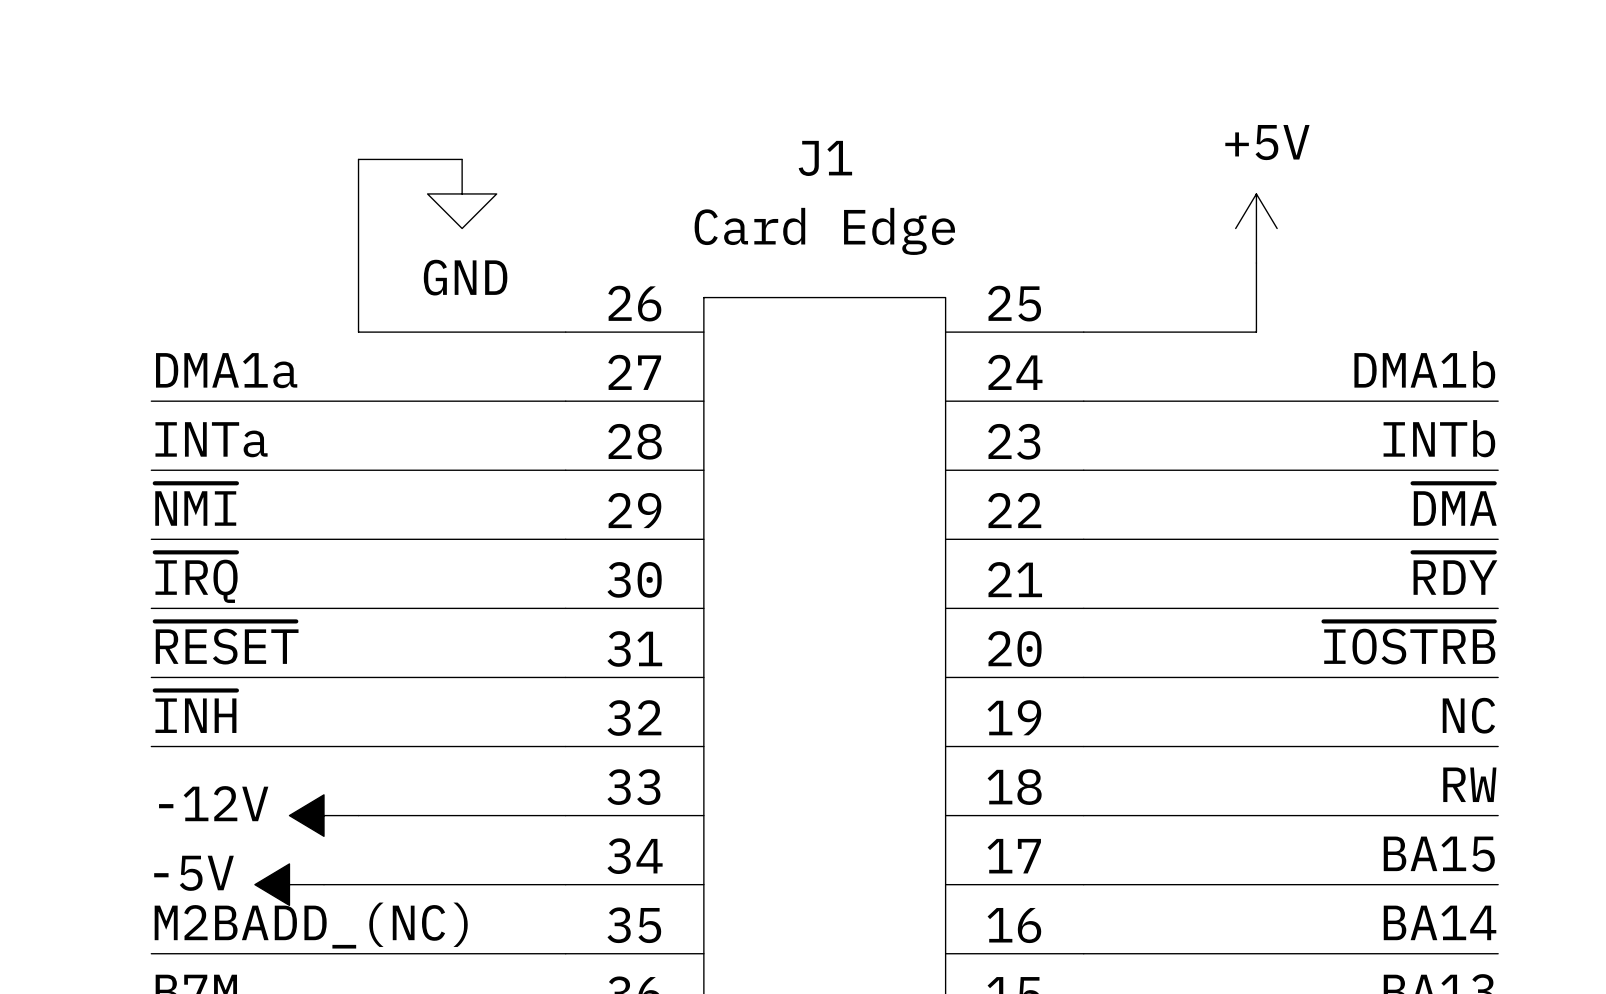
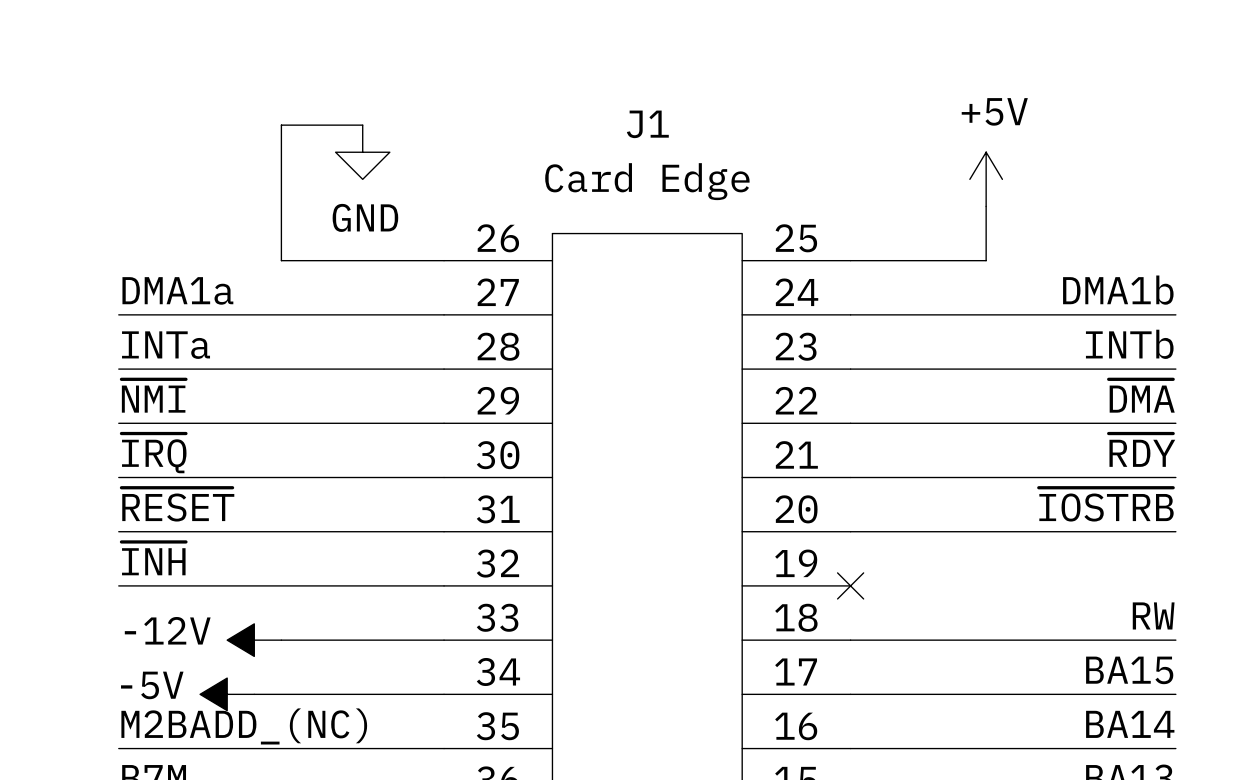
label: NC (1468, 715) -> none
wire: (1083, 746) (1498, 746) -> none
no-connect mark: none -> (850, 585)

